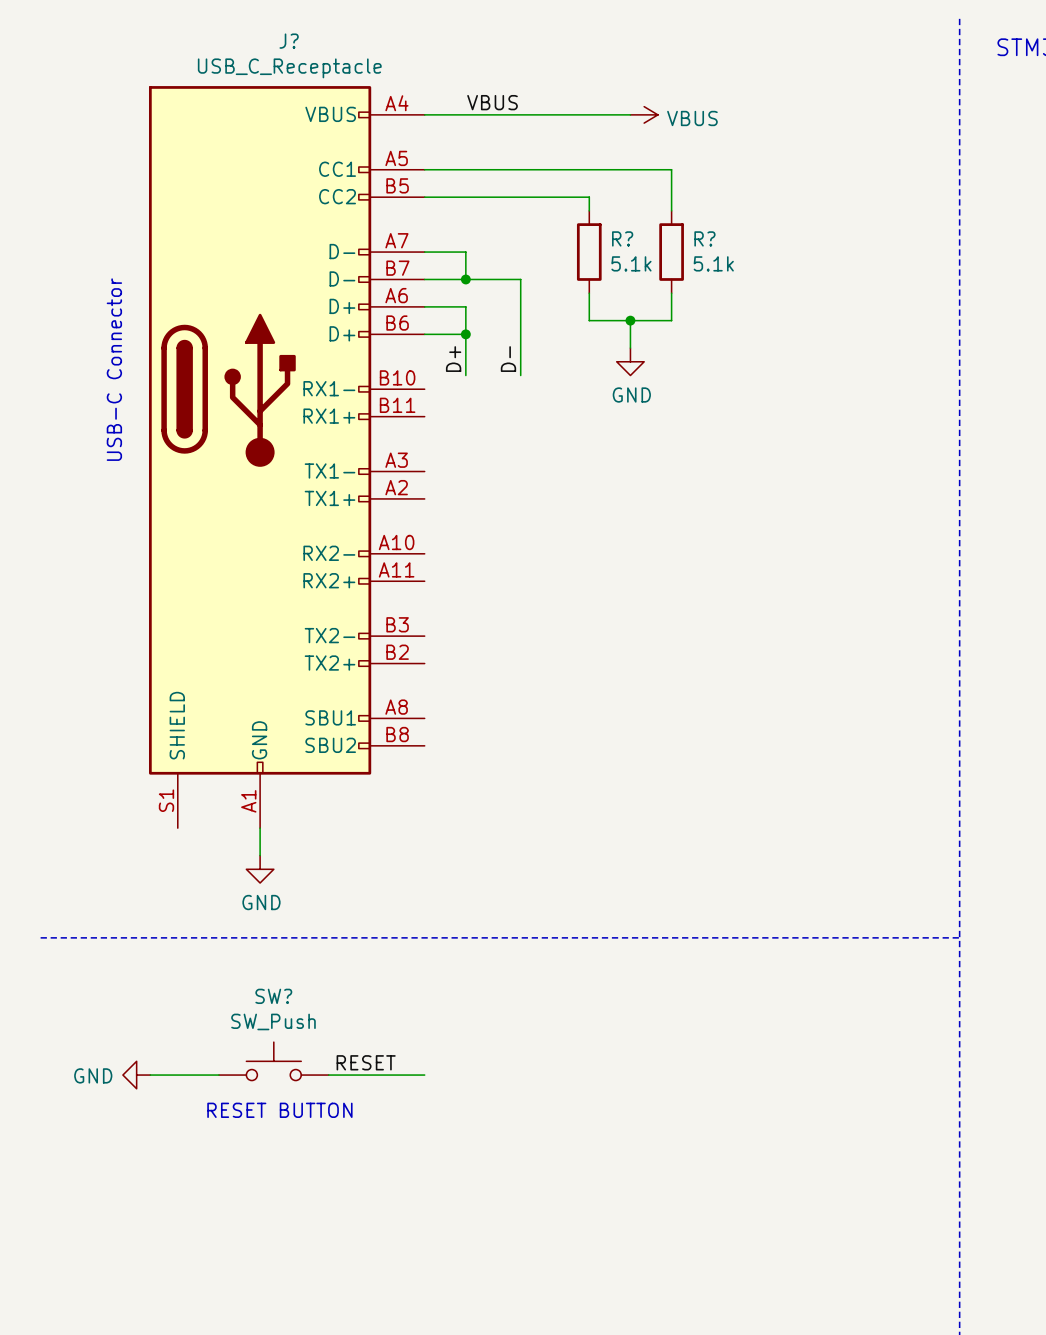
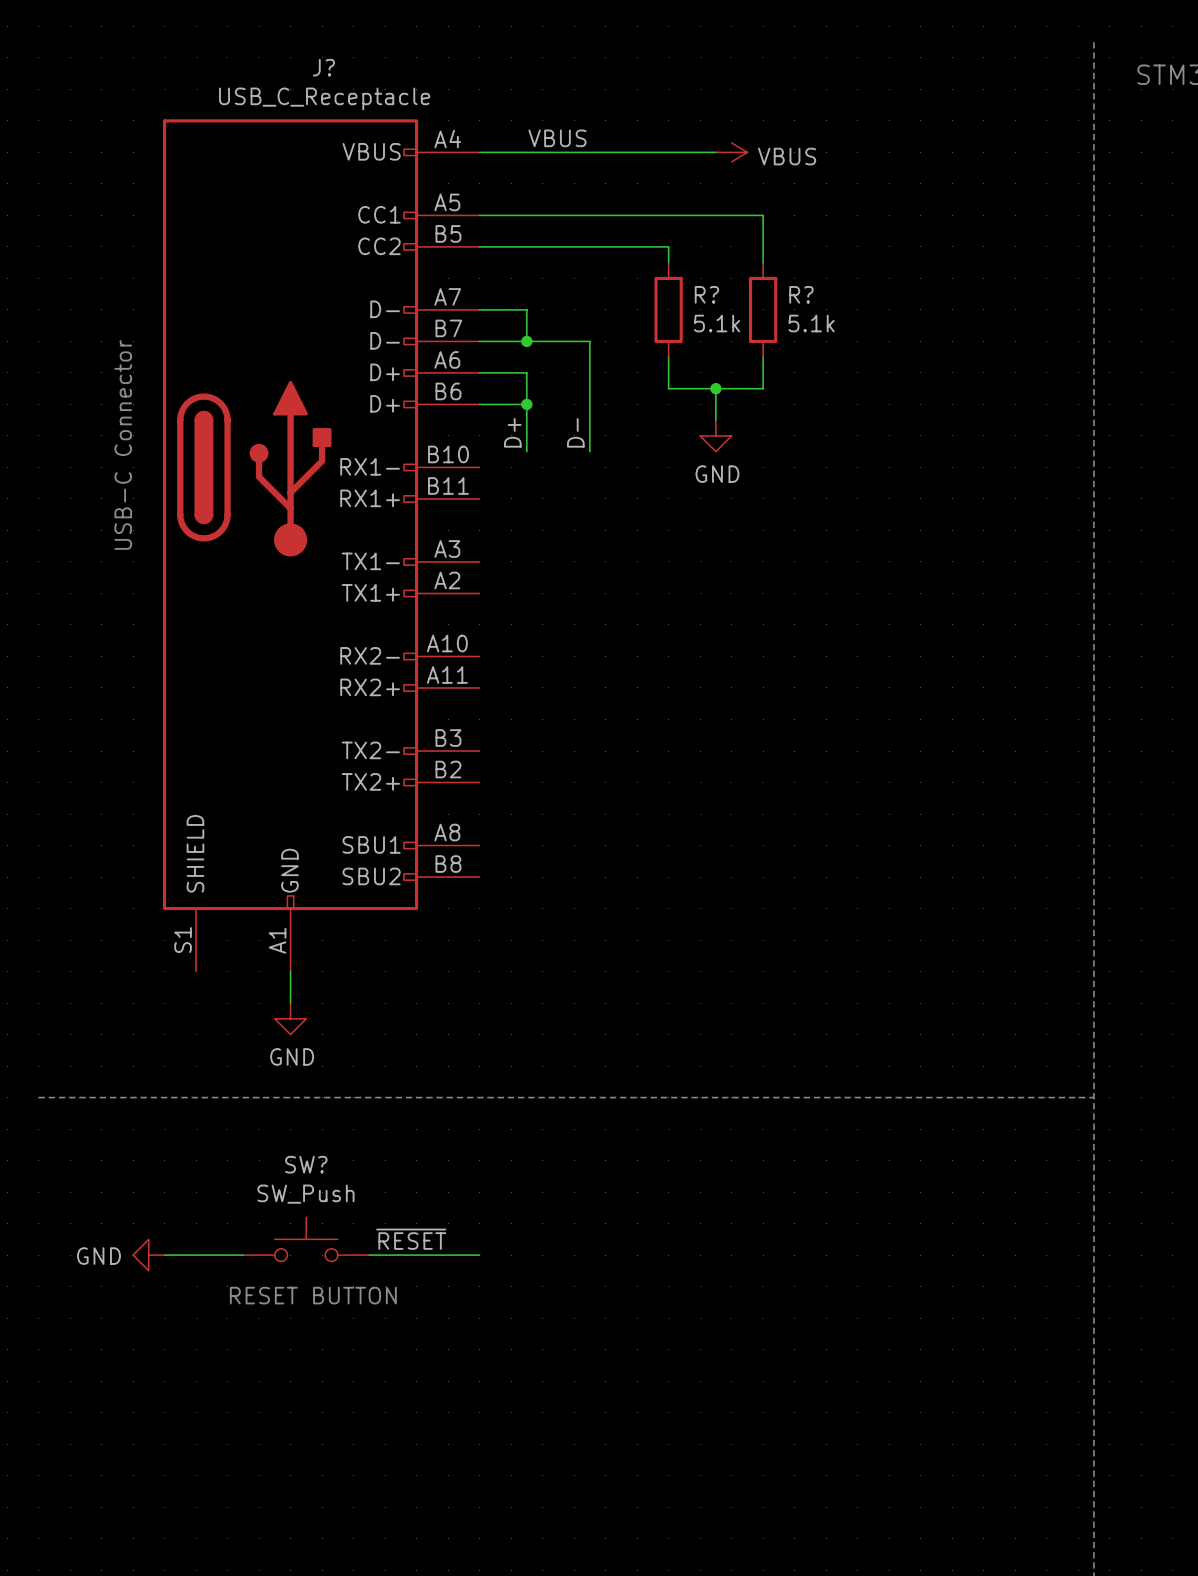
label: RESET (366, 1062) -> ~{RESET} (411, 1239)

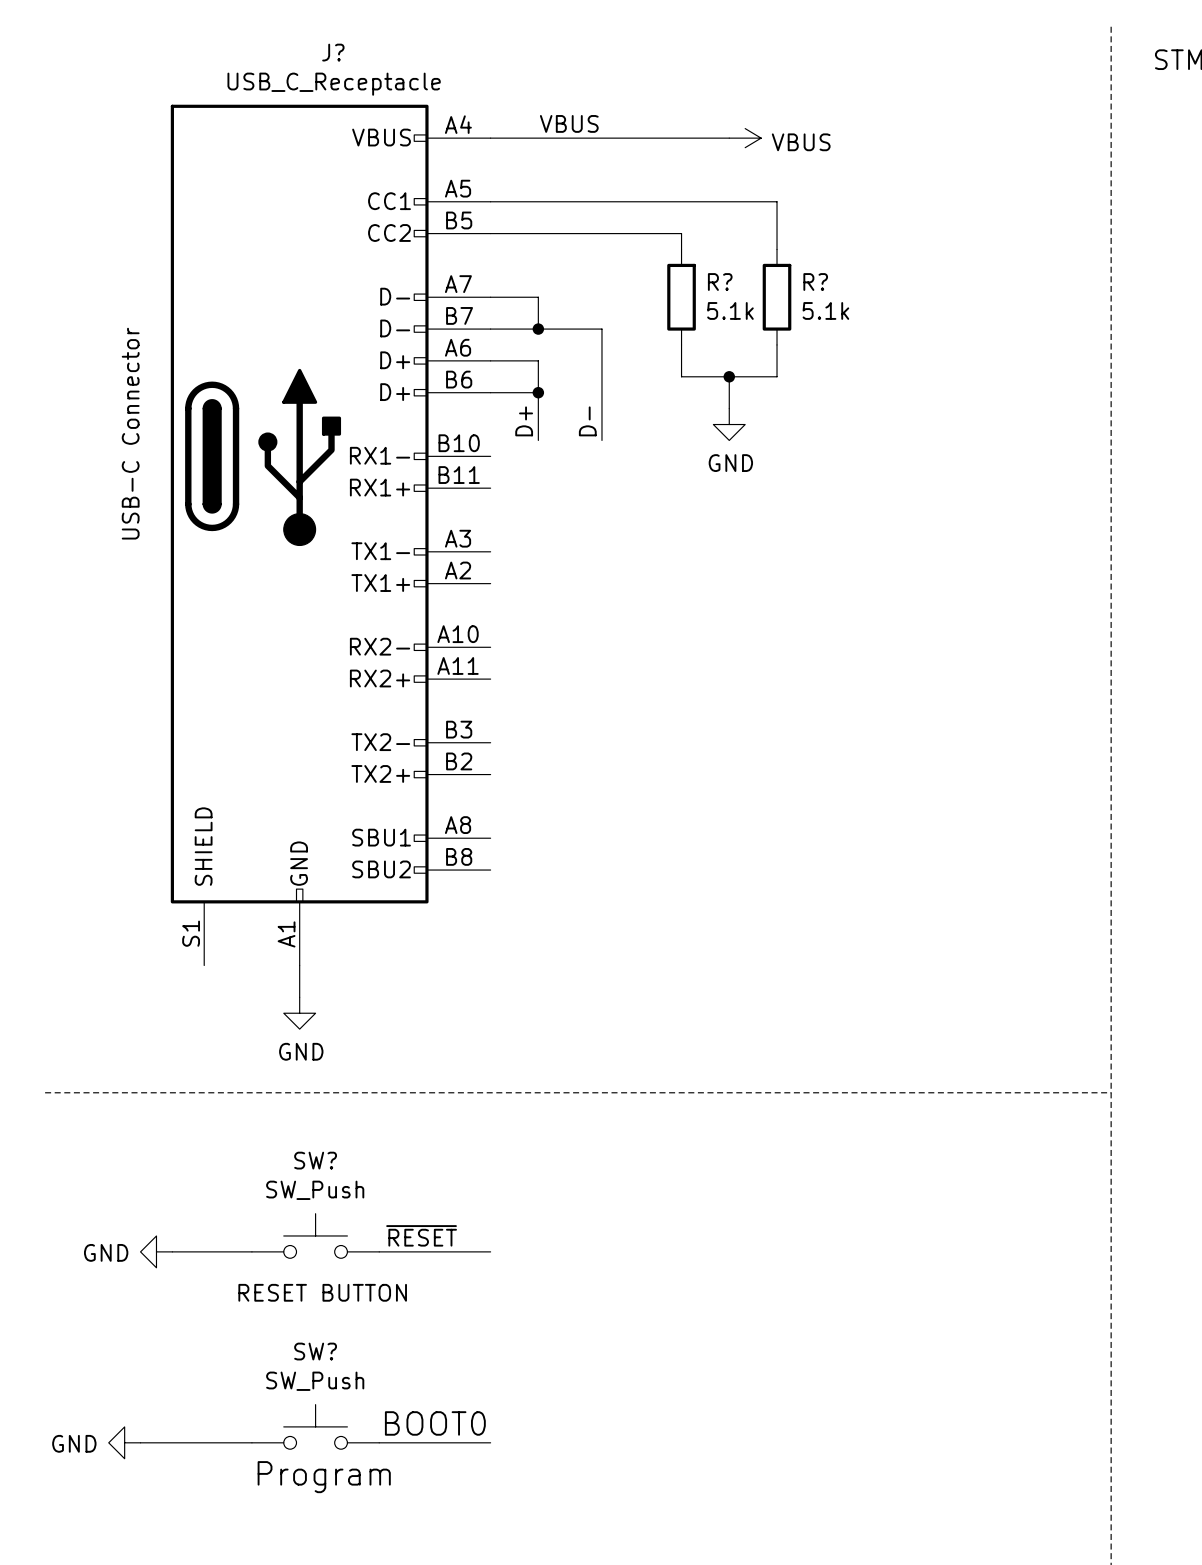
label: none -> BOOT0 (435, 1423)
SW?: none -> SW_Push (315, 1426)
power symbol: none -> GND (124, 1442)
wire: none -> (140, 1442) (251, 1442)
wire: none -> (379, 1442) (490, 1442)
text: none -> Program (324, 1477)

